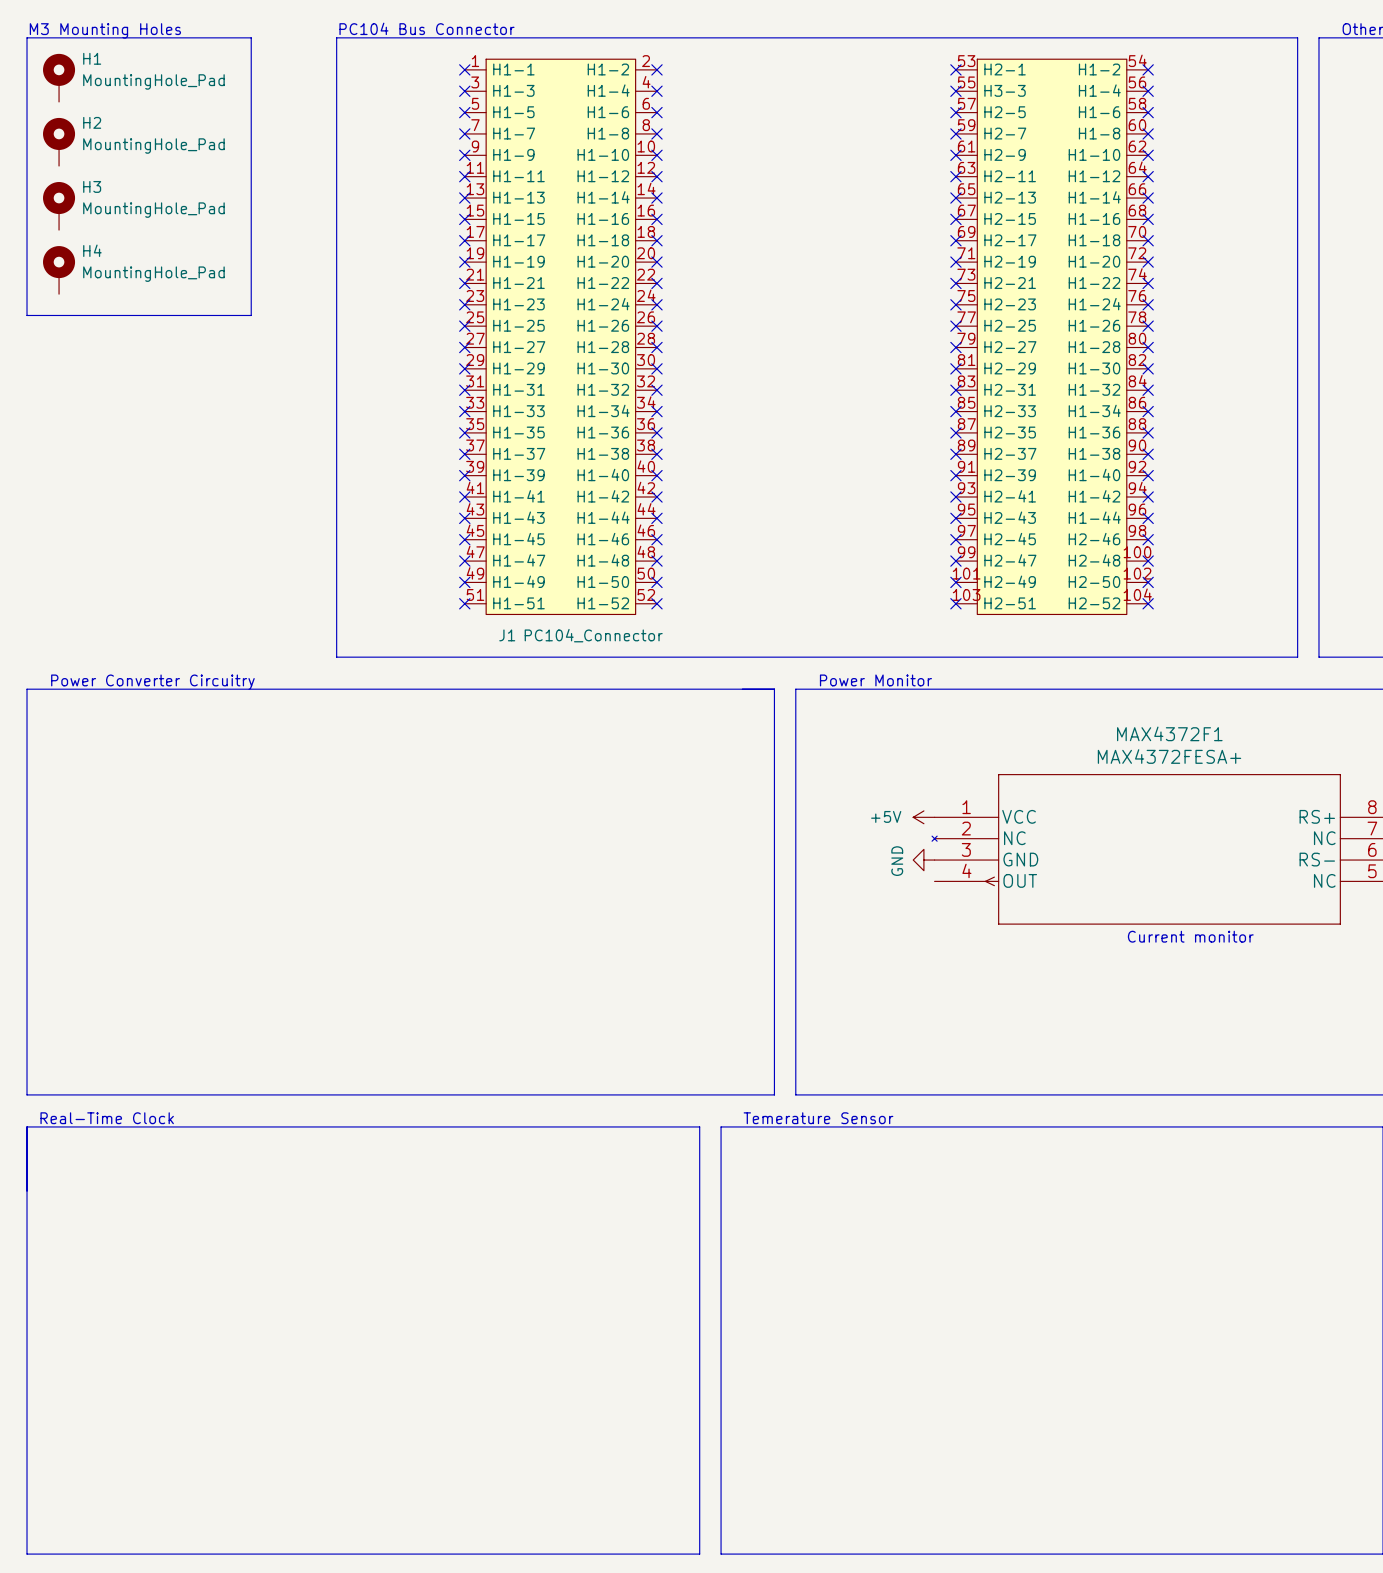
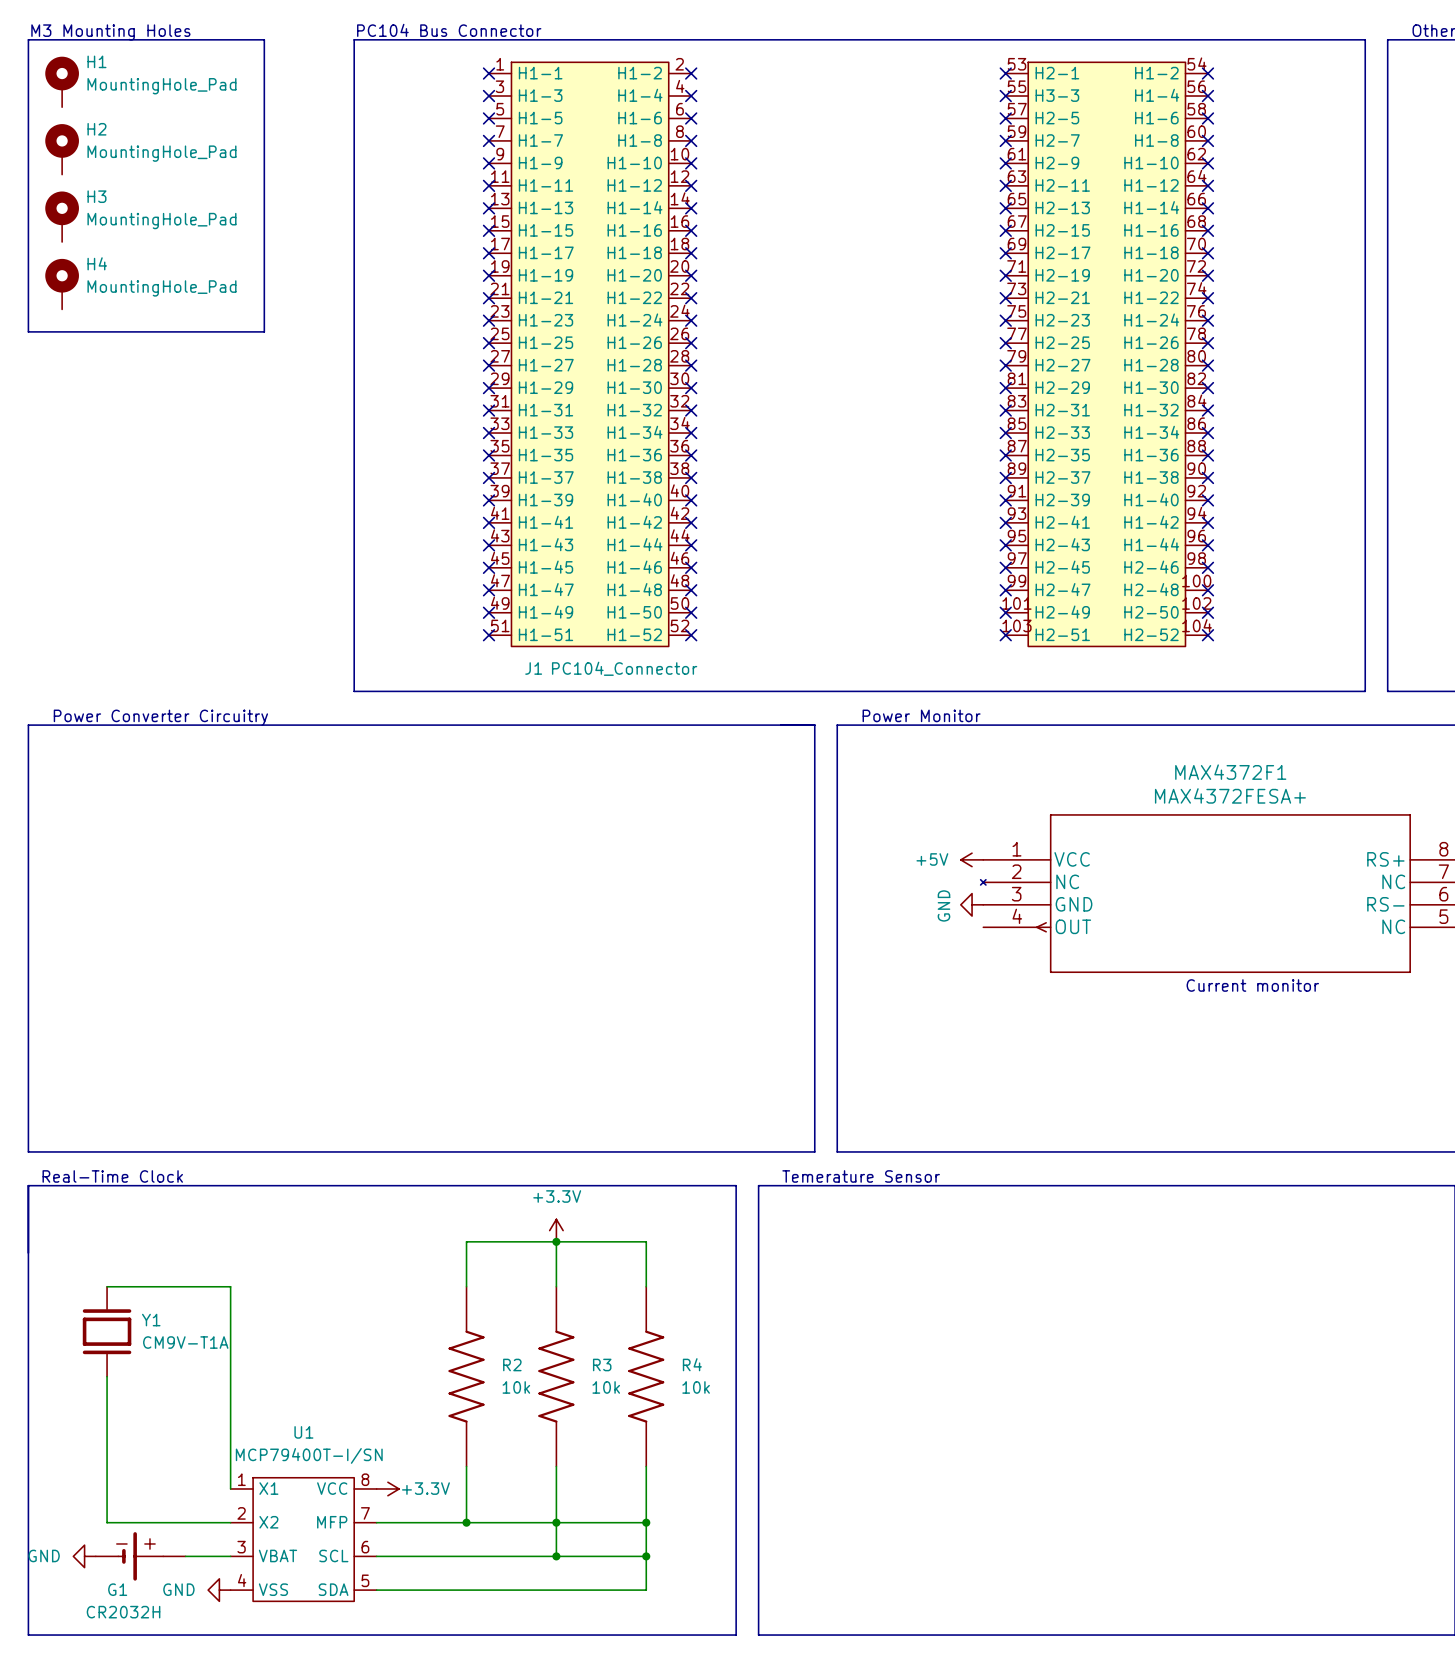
power symbol: none -> +3.3V (556, 1230)
wire: none -> (556, 1241) (556, 1286)
junction: none -> (556, 1241)
wire: none -> (107, 1286) (230, 1286) (230, 1488)
wire: none -> (466, 1286) (466, 1241) (646, 1241) (646, 1286)
Y1: none -> CM9V-T1A (107, 1331)
wire: none -> (107, 1376) (107, 1522) (230, 1522)
R2: none -> 10k (466, 1376)
R3: none -> 10k (556, 1376)
R4: none -> 10k (646, 1376)
wire: none -> (466, 1466) (466, 1522)
wire: none -> (556, 1466) (556, 1556)
wire: none -> (646, 1466) (646, 1590) (376, 1590)
power symbol: none -> +3.3V (387, 1488)
wire: none -> (376, 1522) (646, 1522)
junction: none -> (466, 1522)
junction: none -> (556, 1522)
junction: none -> (646, 1522)
U1: none -> MCP79400T-I/SN (303, 1539)
power symbol: none -> GND (84, 1556)
G1: none -> CR2032H (140, 1556)
wire: none -> (185, 1556) (230, 1556)
wire: none -> (376, 1556) (646, 1556)
junction: none -> (556, 1556)
junction: none -> (646, 1556)
power symbol: none -> GND (219, 1590)

